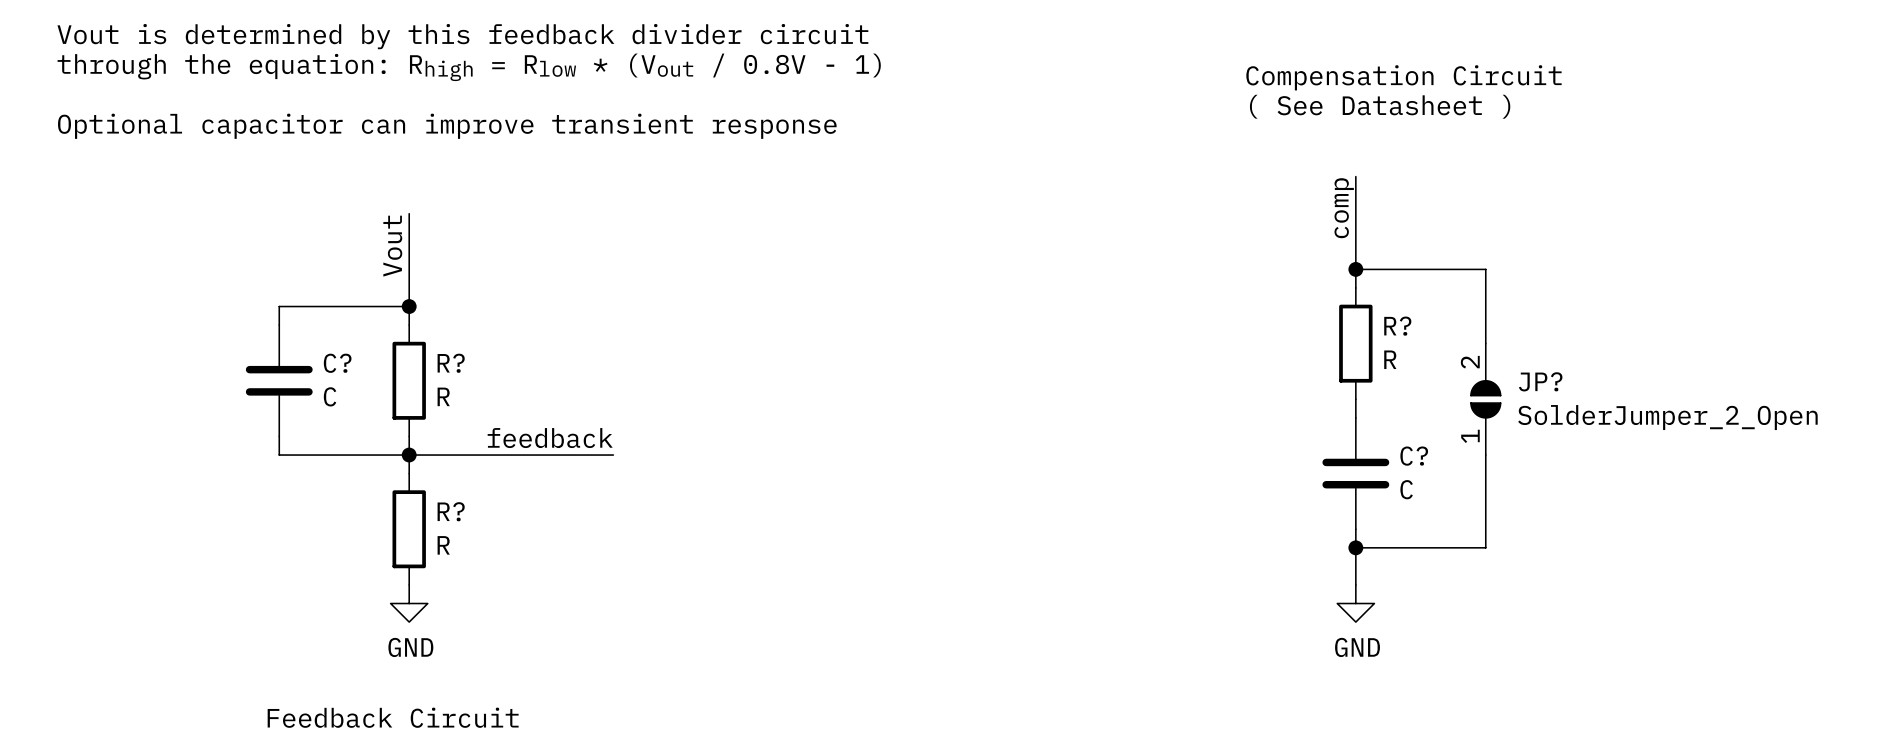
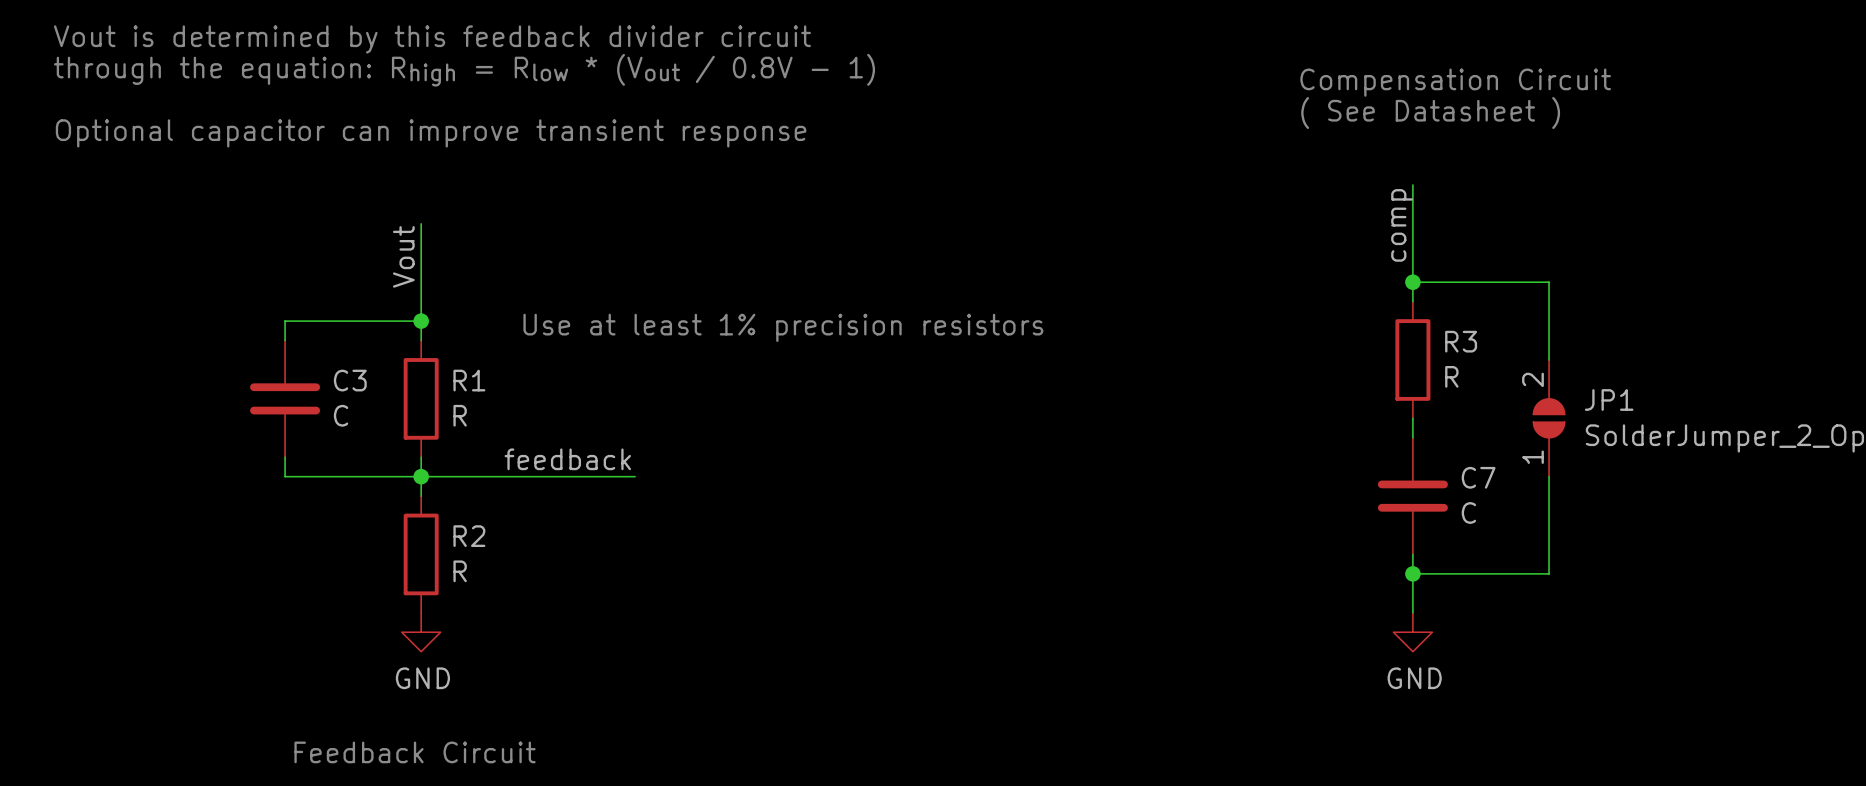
text: none -> Use at least 1% precision resistors (783, 327)
R? name: R? (1397, 326) -> R3 (1461, 341)
C? name: C? (337, 363) -> C3 (350, 380)
R? name: R? (451, 363) -> R1 (469, 380)
JP? name: JP? (1540, 381) -> JP1 (1609, 400)
C? name: C? (1414, 456) -> C7 (1478, 477)
R? name: R? (451, 511) -> R2 (469, 536)

